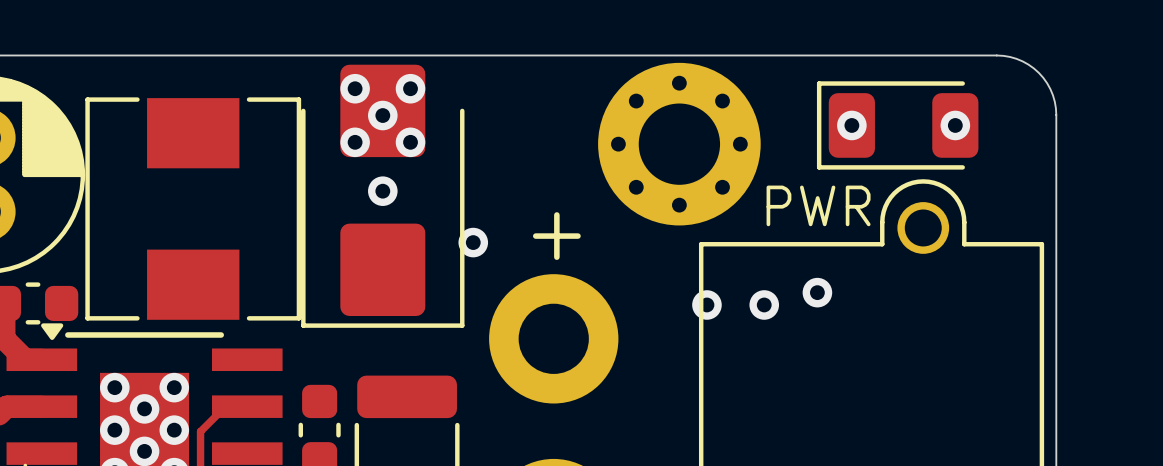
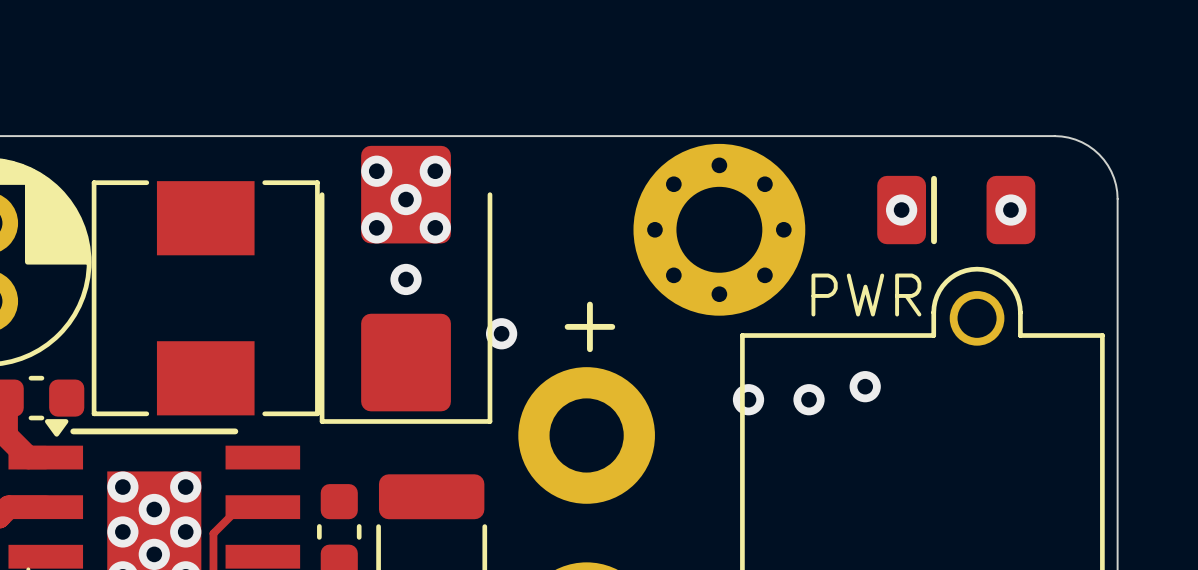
part footprint: [816, 81, 979, 170] -> [877, 175, 1036, 245]

